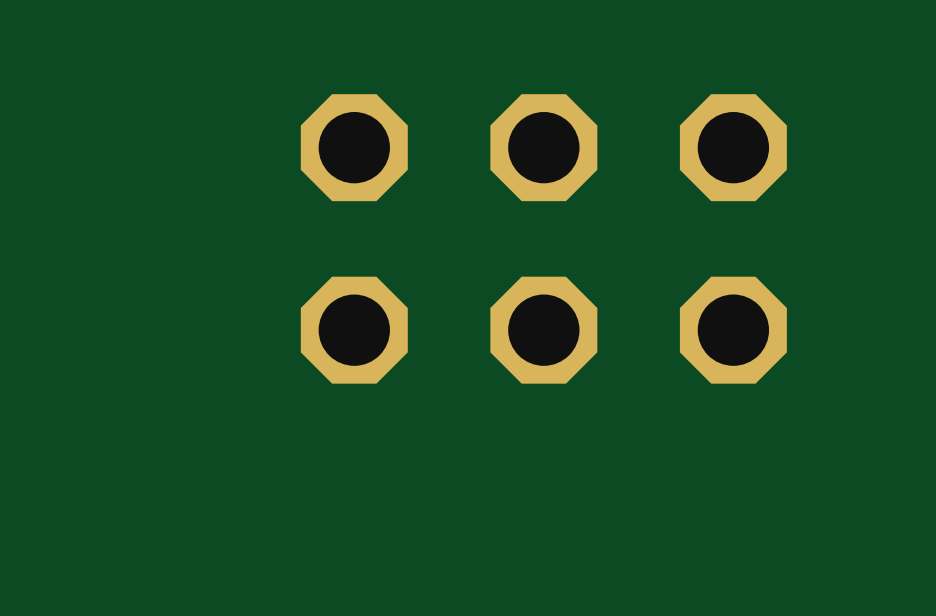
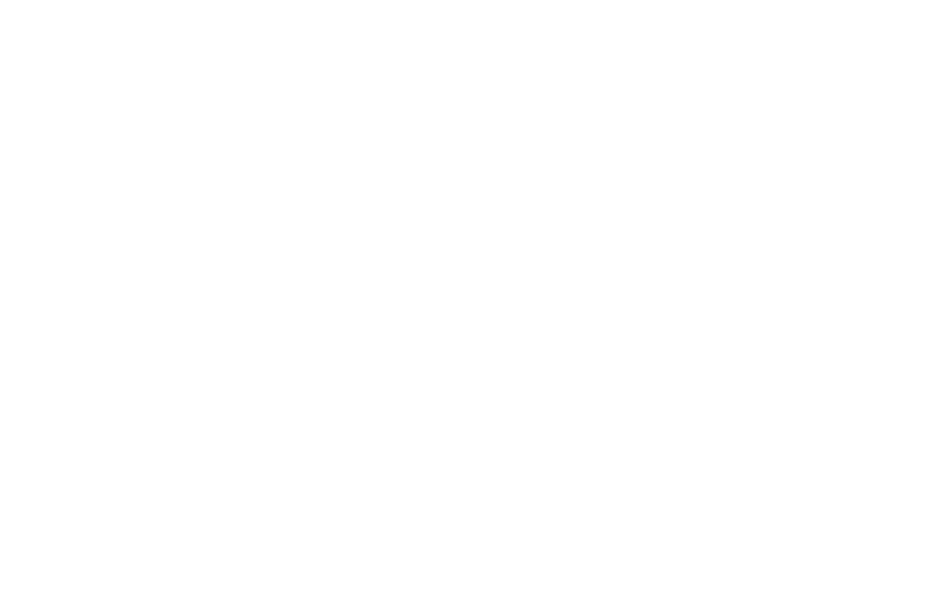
part: (354, 147) -> none
part: (543, 147) -> none
part: (733, 147) -> none
part: (354, 330) -> none
part: (543, 330) -> none
part: (733, 330) -> none

